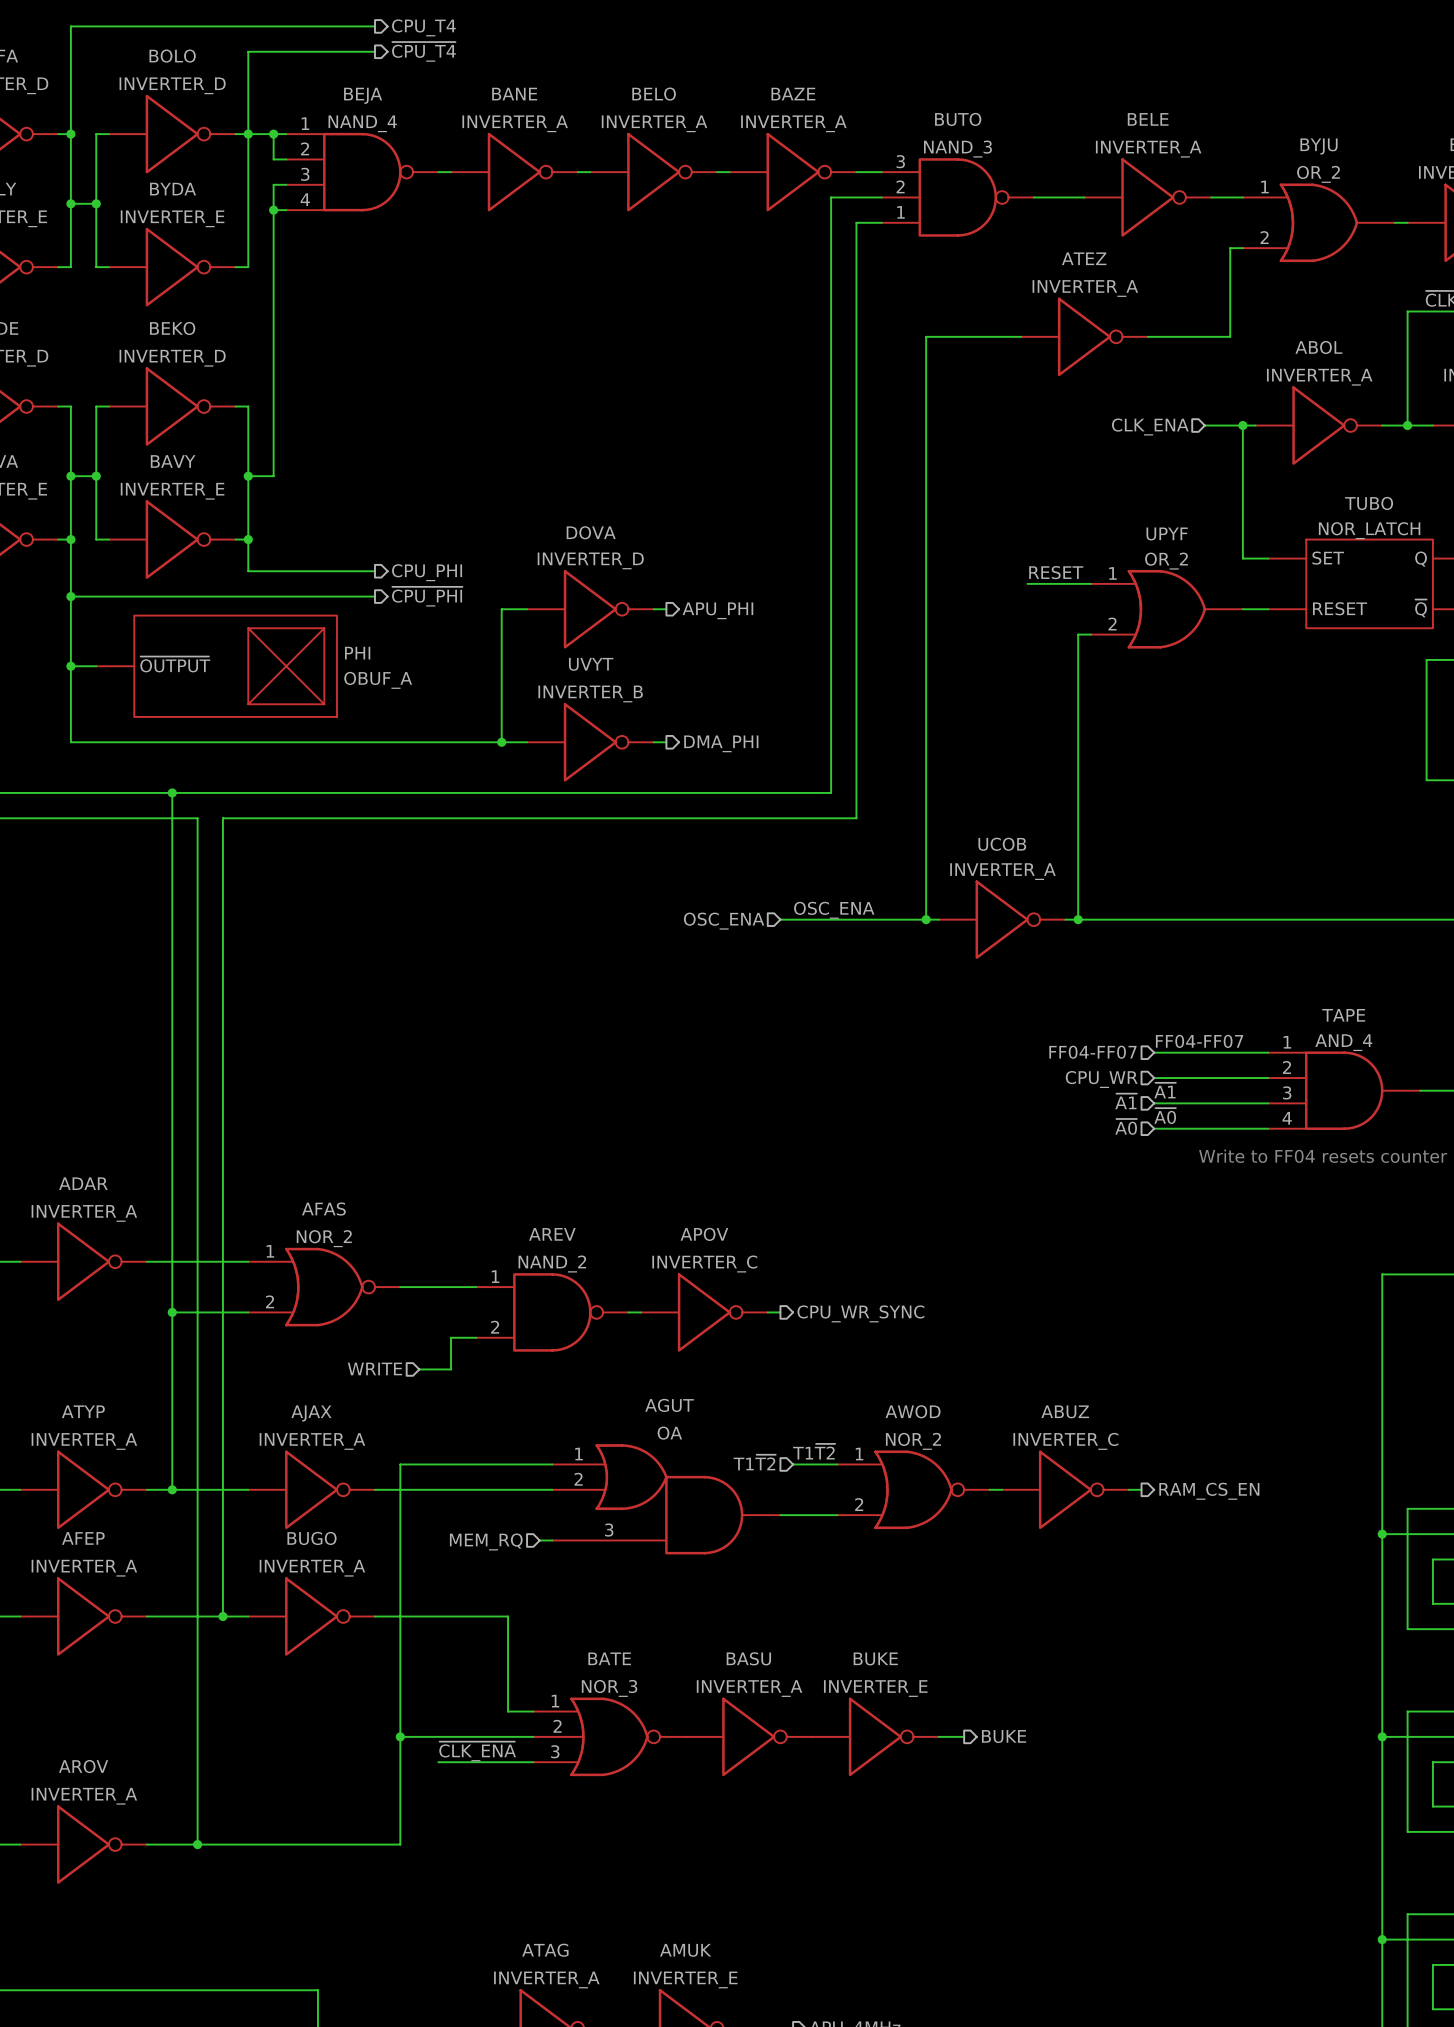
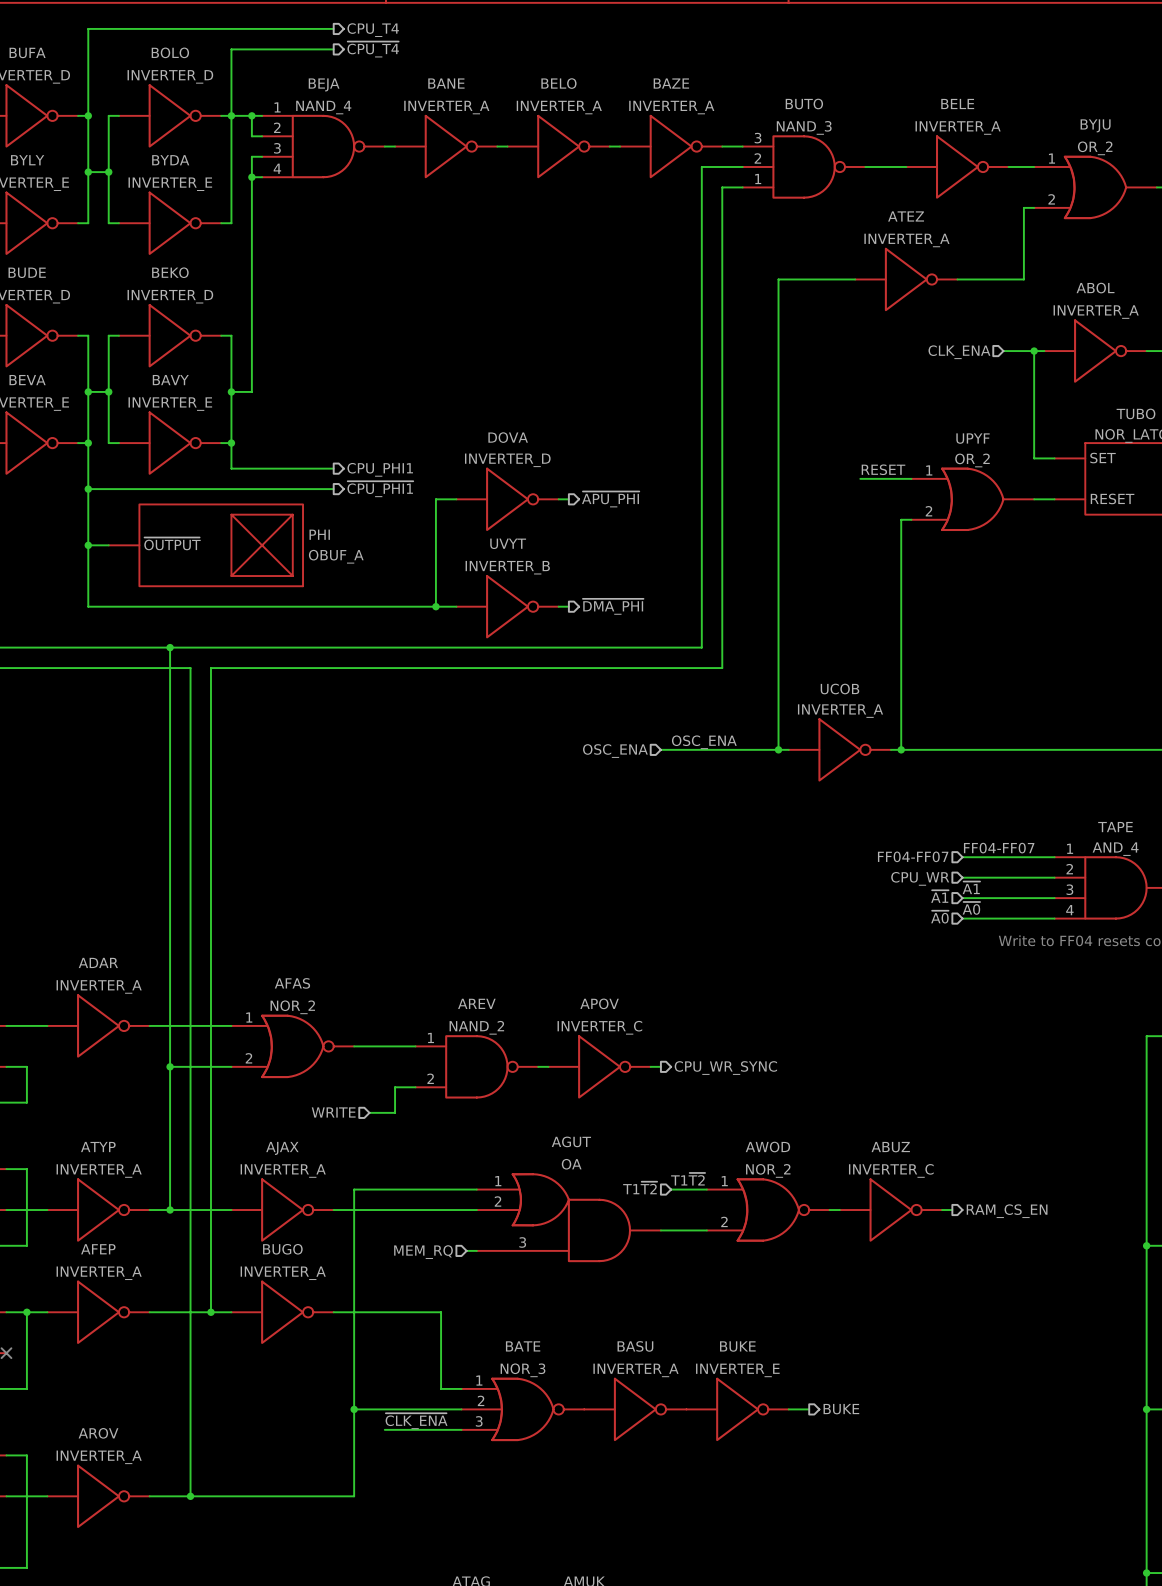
hierarchical label: CPU_PHI (427, 572) -> CPU_PHI1 (380, 469)
hierarchical label: ~{CPU_PHI} (427, 596) -> ~{CPU_PHI1} (380, 489)
hierarchical label: APU_PHI (717, 610) -> ~{APU_PHI} (610, 499)
hierarchical label: DMA_PHI (721, 743) -> ~{DMA_PHI} (613, 606)

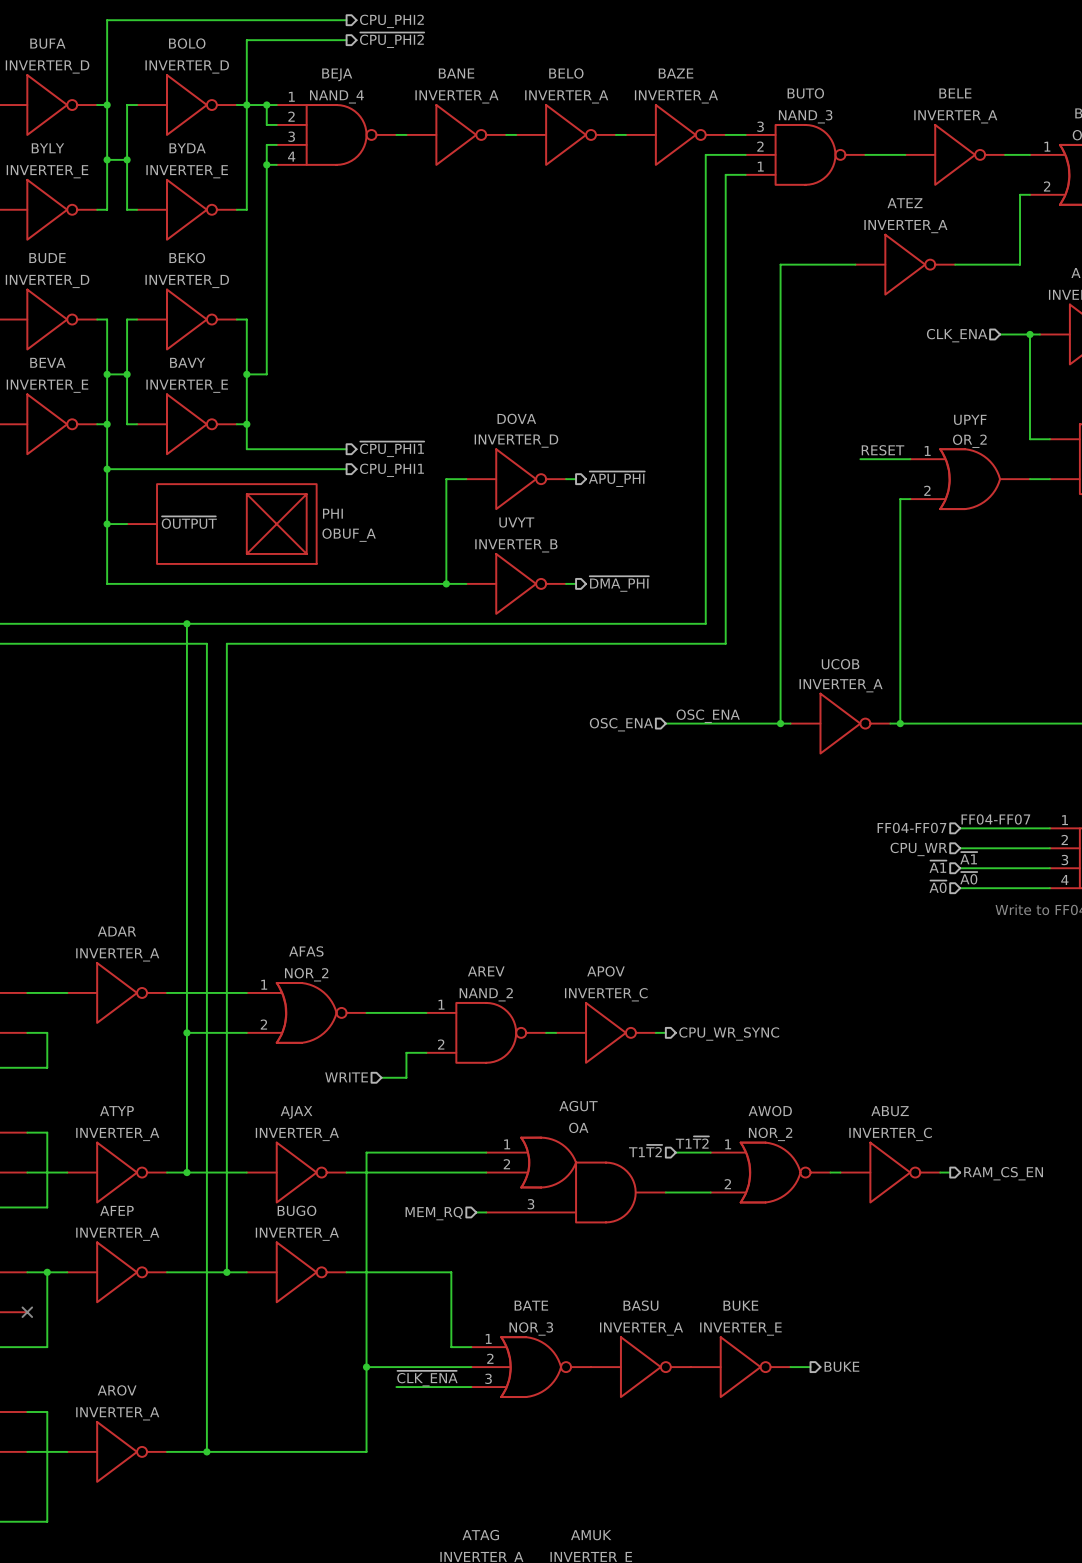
hierarchical label: CPU_T4 (373, 30) -> CPU_PHI2 (391, 21)
hierarchical label: ~{CPU_T4} (373, 49) -> ~{CPU_PHI2} (392, 40)
hierarchical label: CPU_PHI1 (380, 469) -> ~{CPU_PHI1} (392, 449)
hierarchical label: ~{CPU_PHI1} (380, 489) -> CPU_PHI1 (391, 470)

